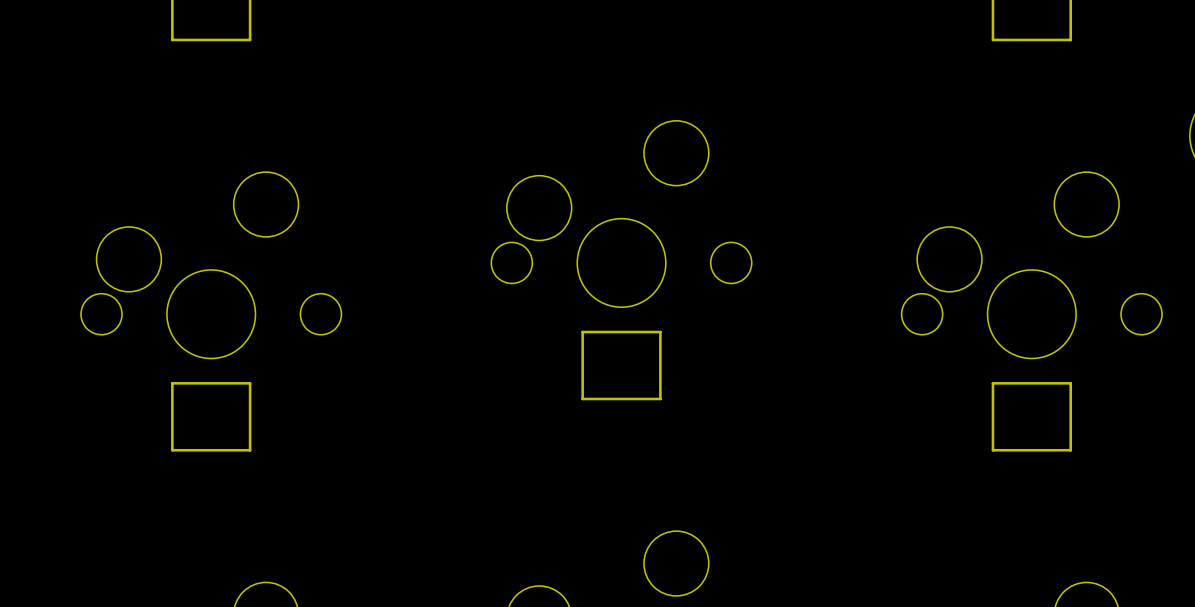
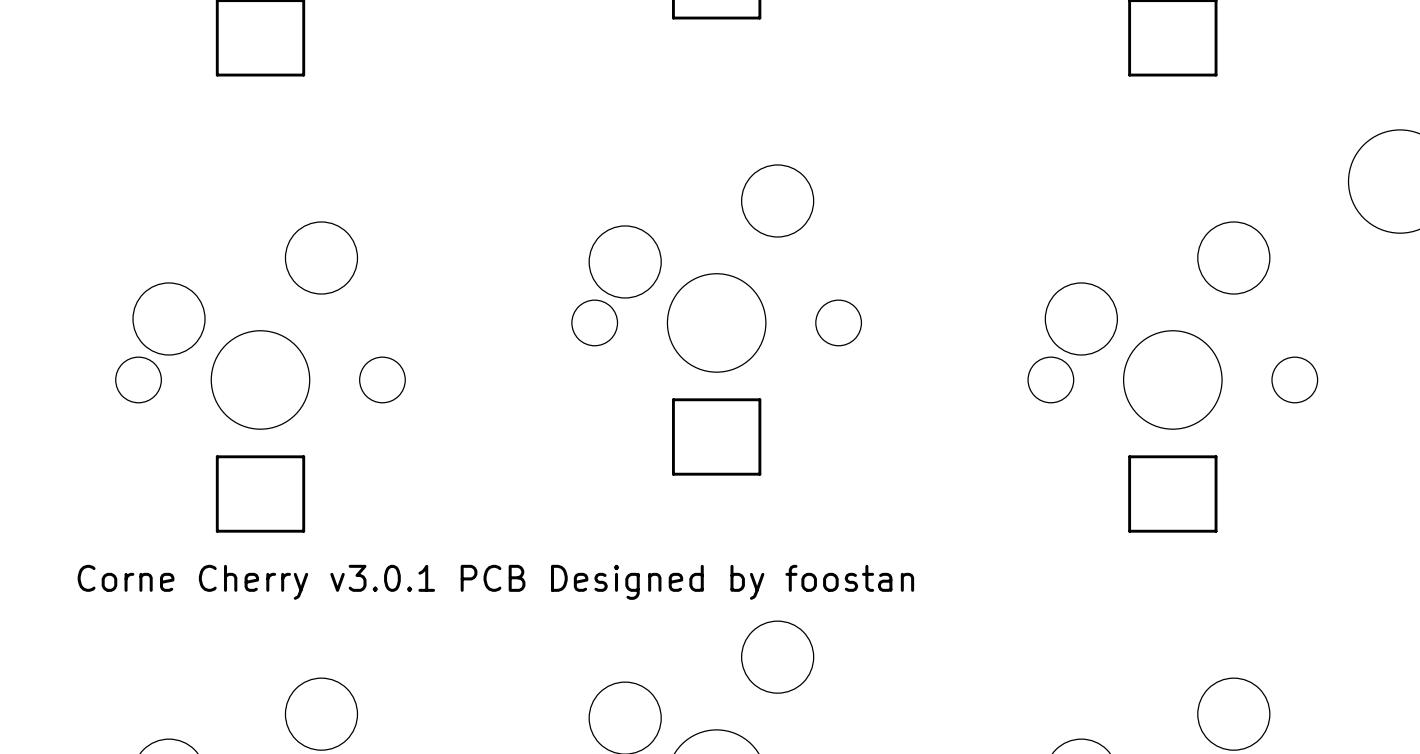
text: none -> Corne Cherry v3.0.1 PCB Designed by foostan (495, 582)

